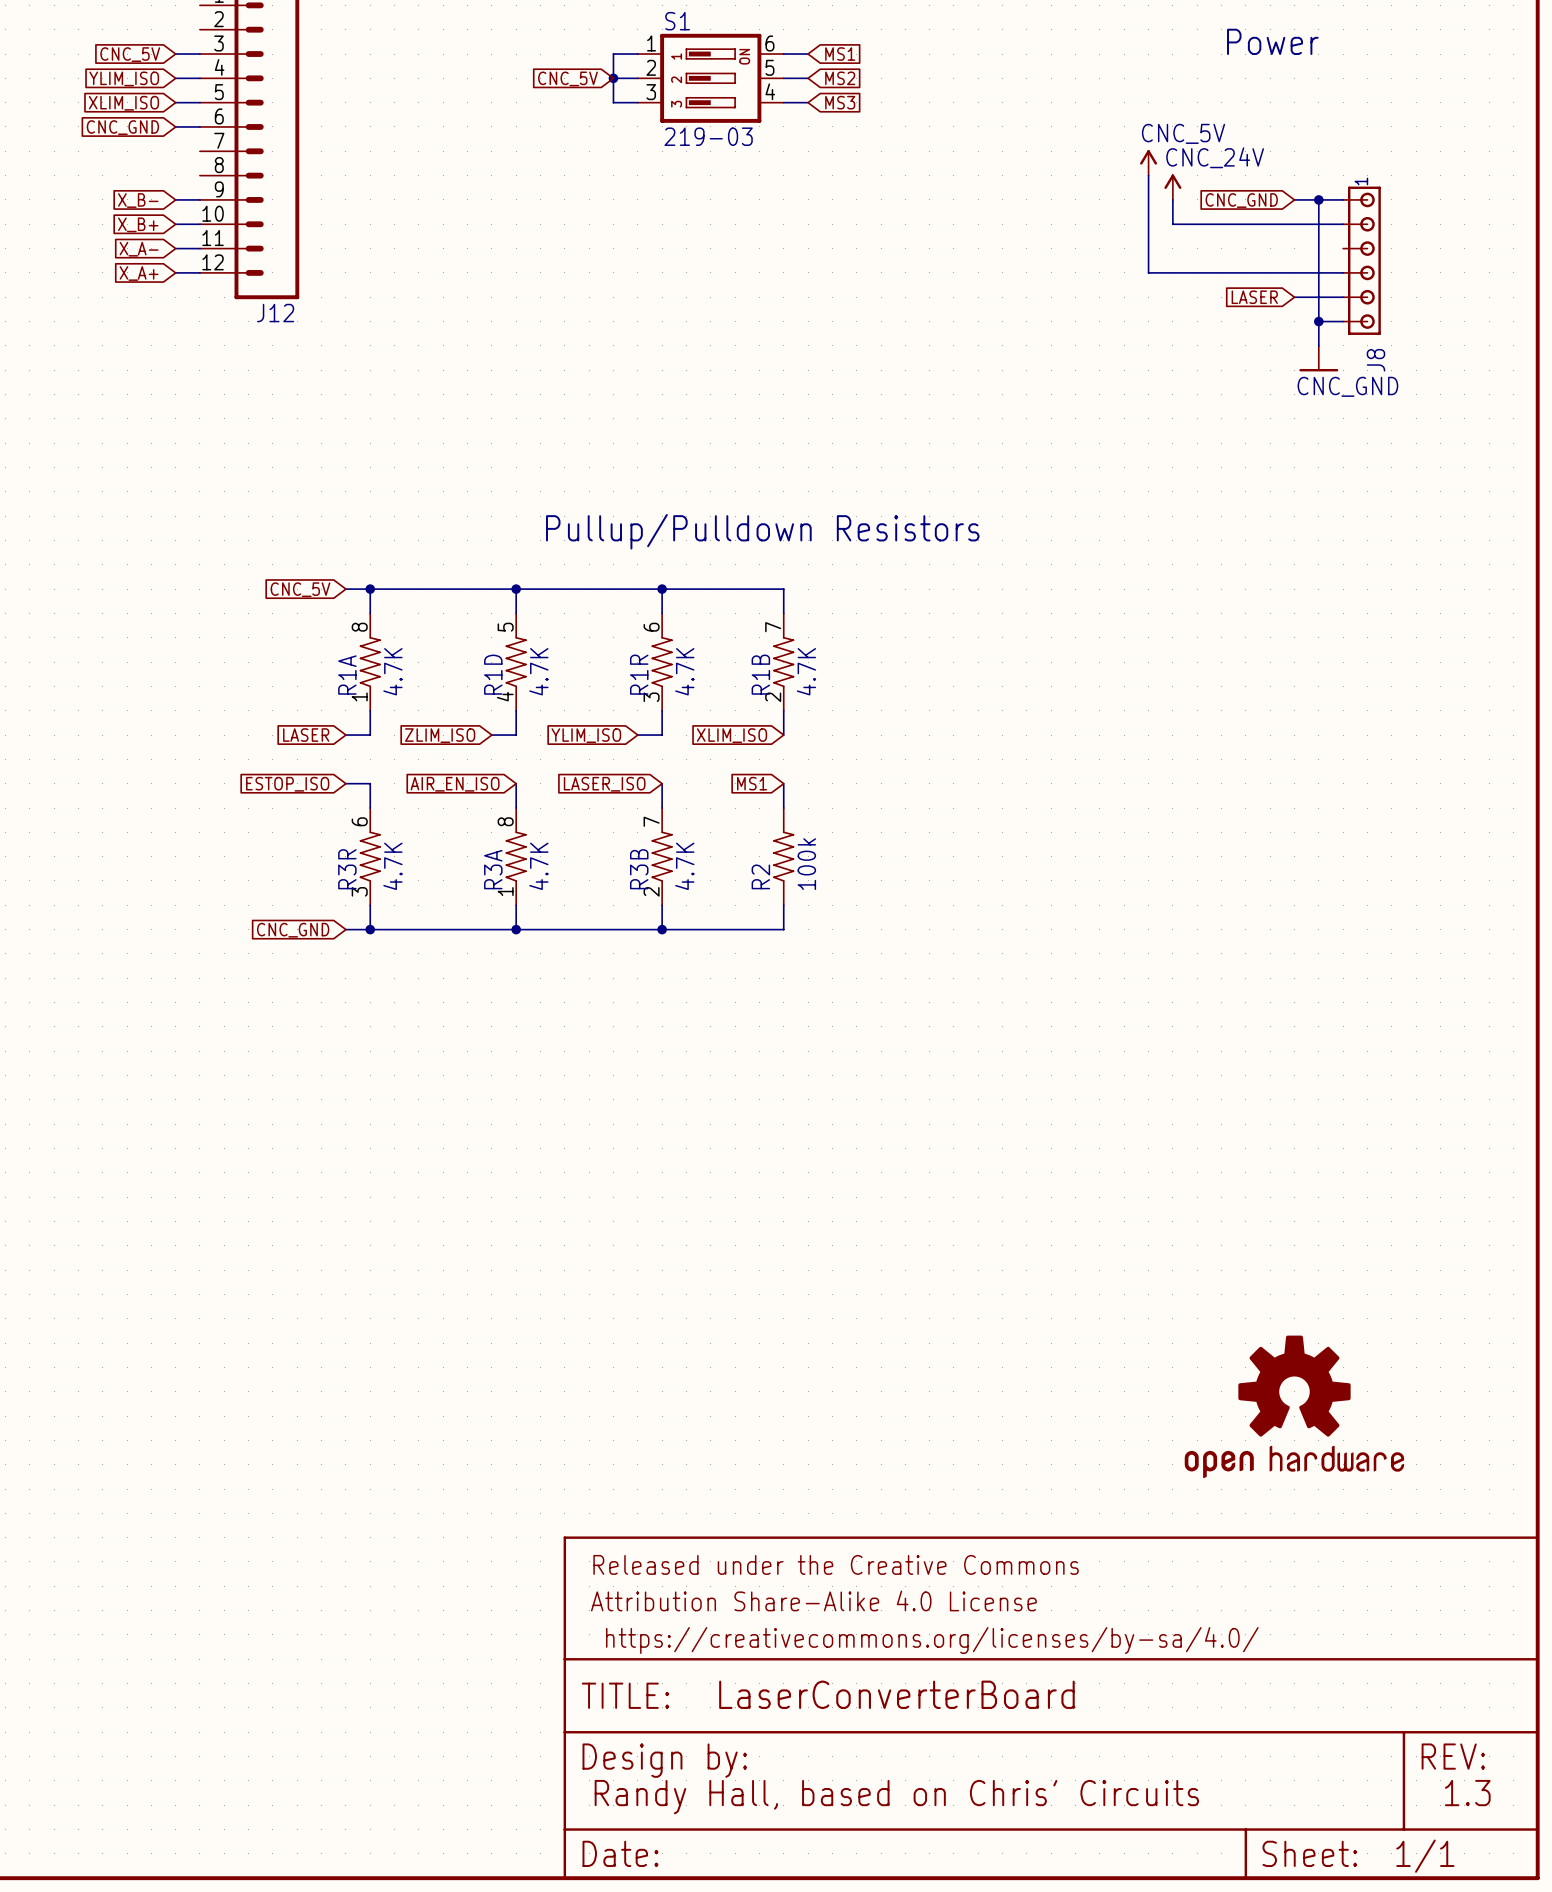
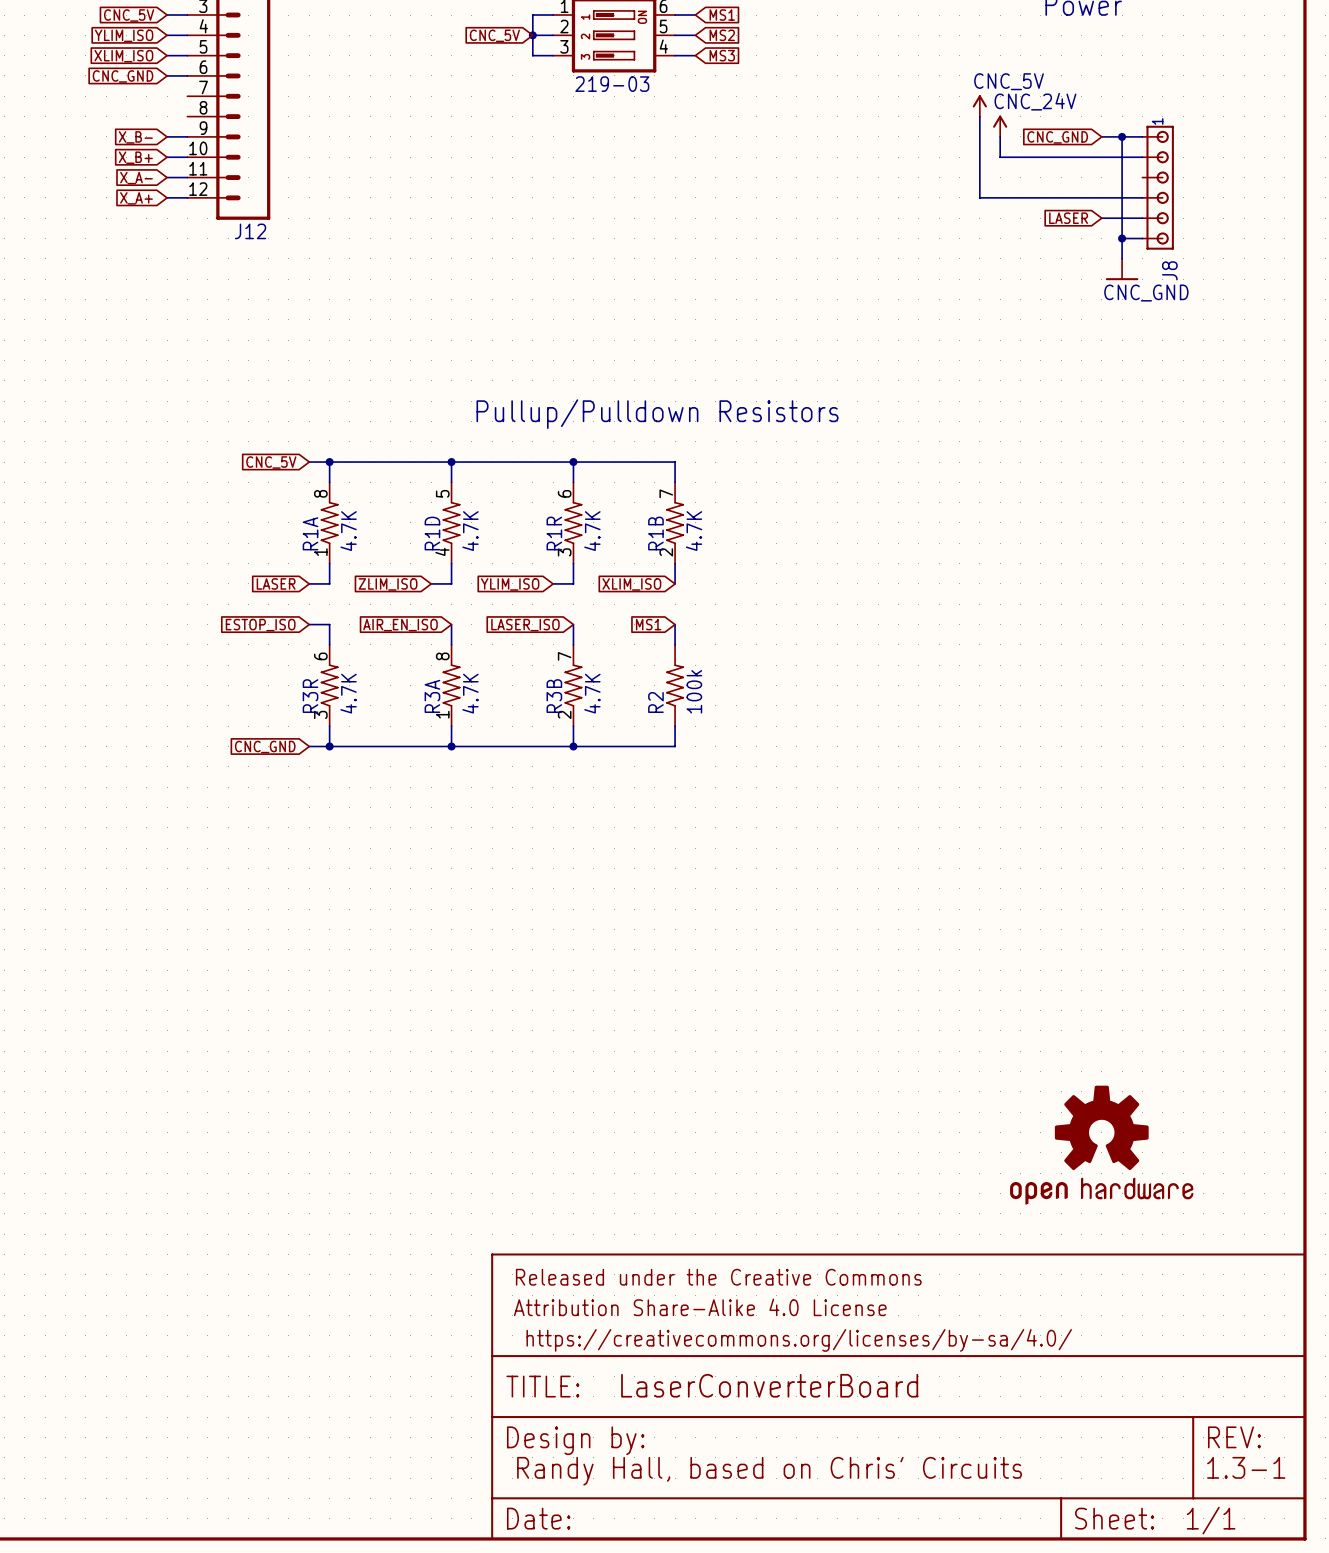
text: 1.3 (1467, 1793) -> 1.3-1 (1246, 1467)

